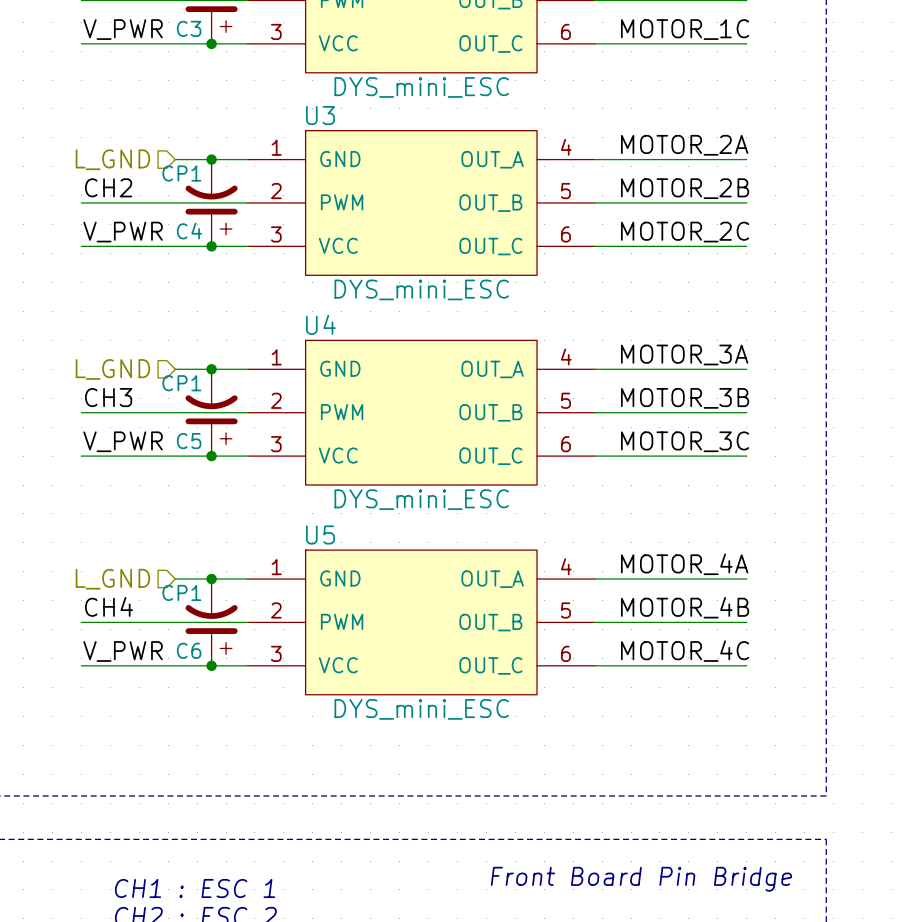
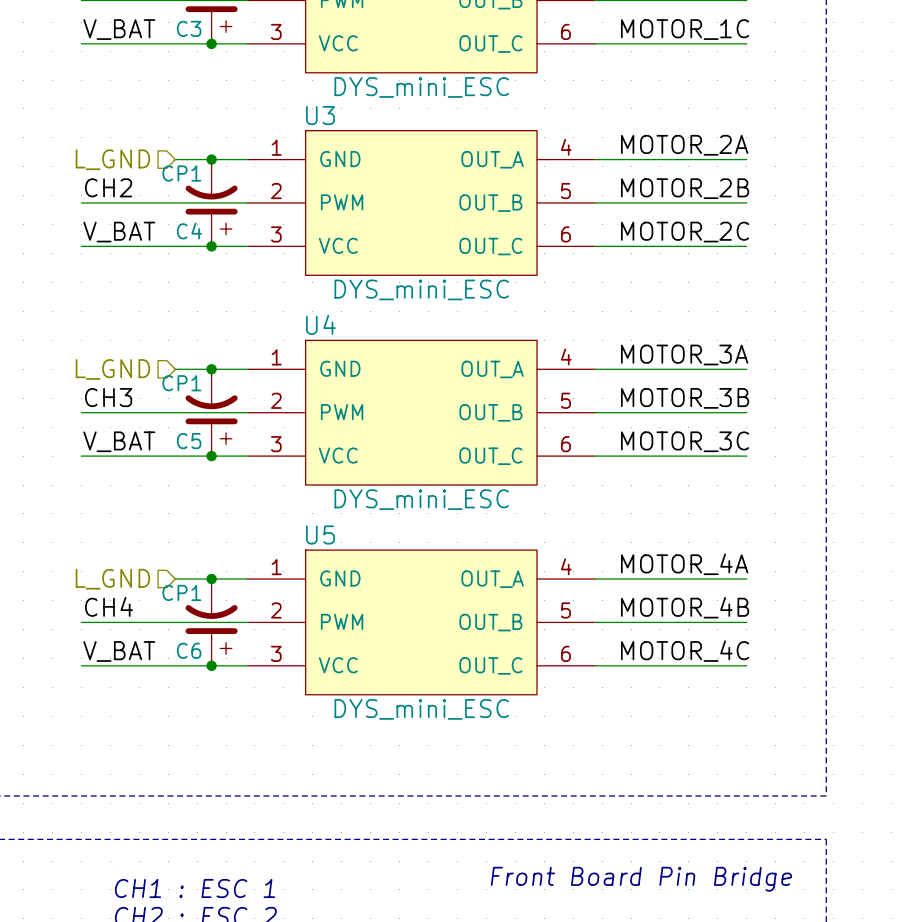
label: V_PWR (123, 29) -> V_BAT (119, 29)
label: V_PWR (123, 232) -> V_BAT (119, 232)
label: V_PWR (123, 441) -> V_BAT (119, 441)
label: V_PWR (123, 651) -> V_BAT (119, 651)

